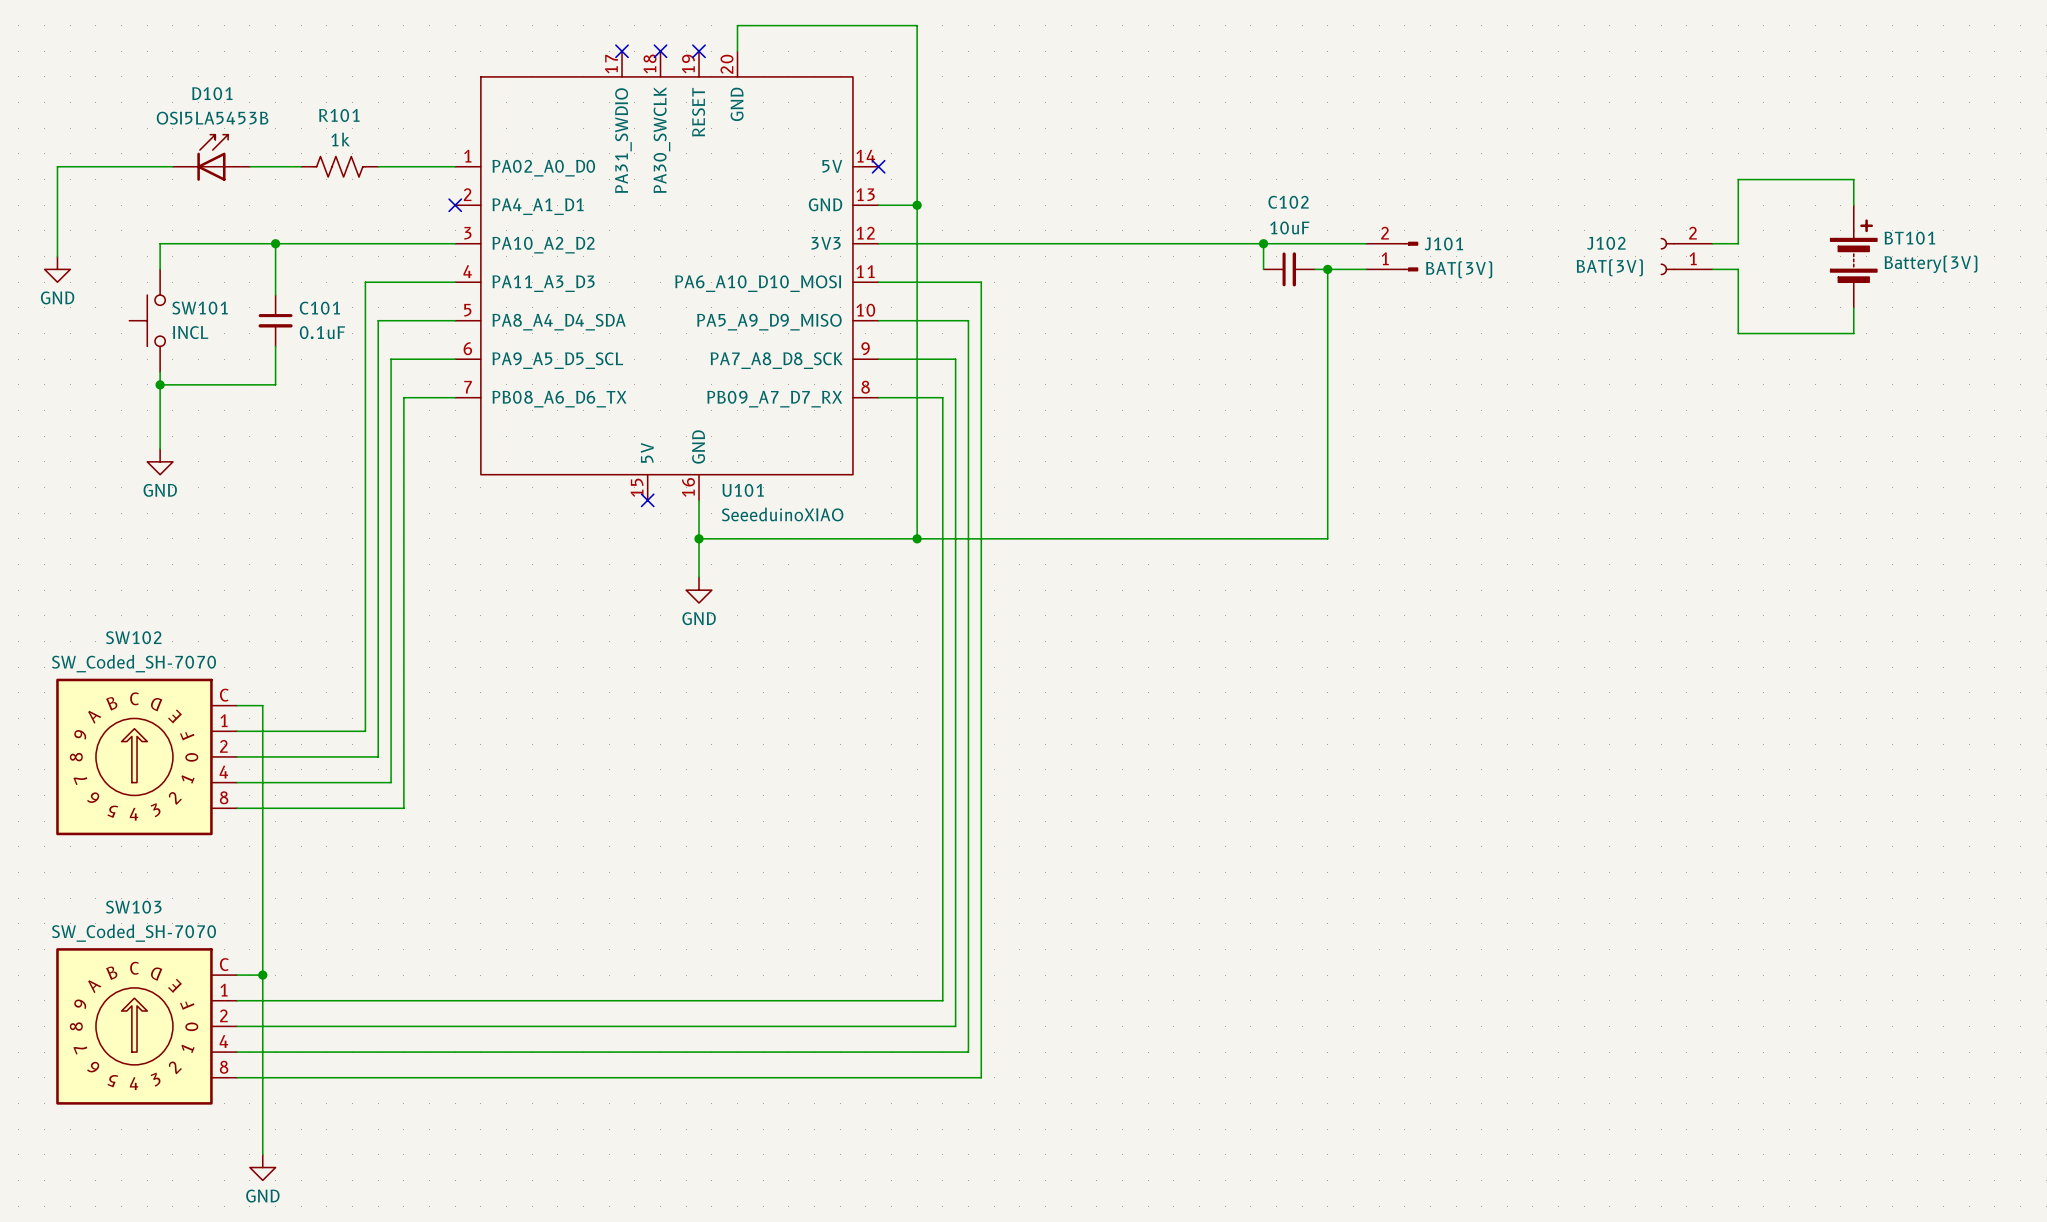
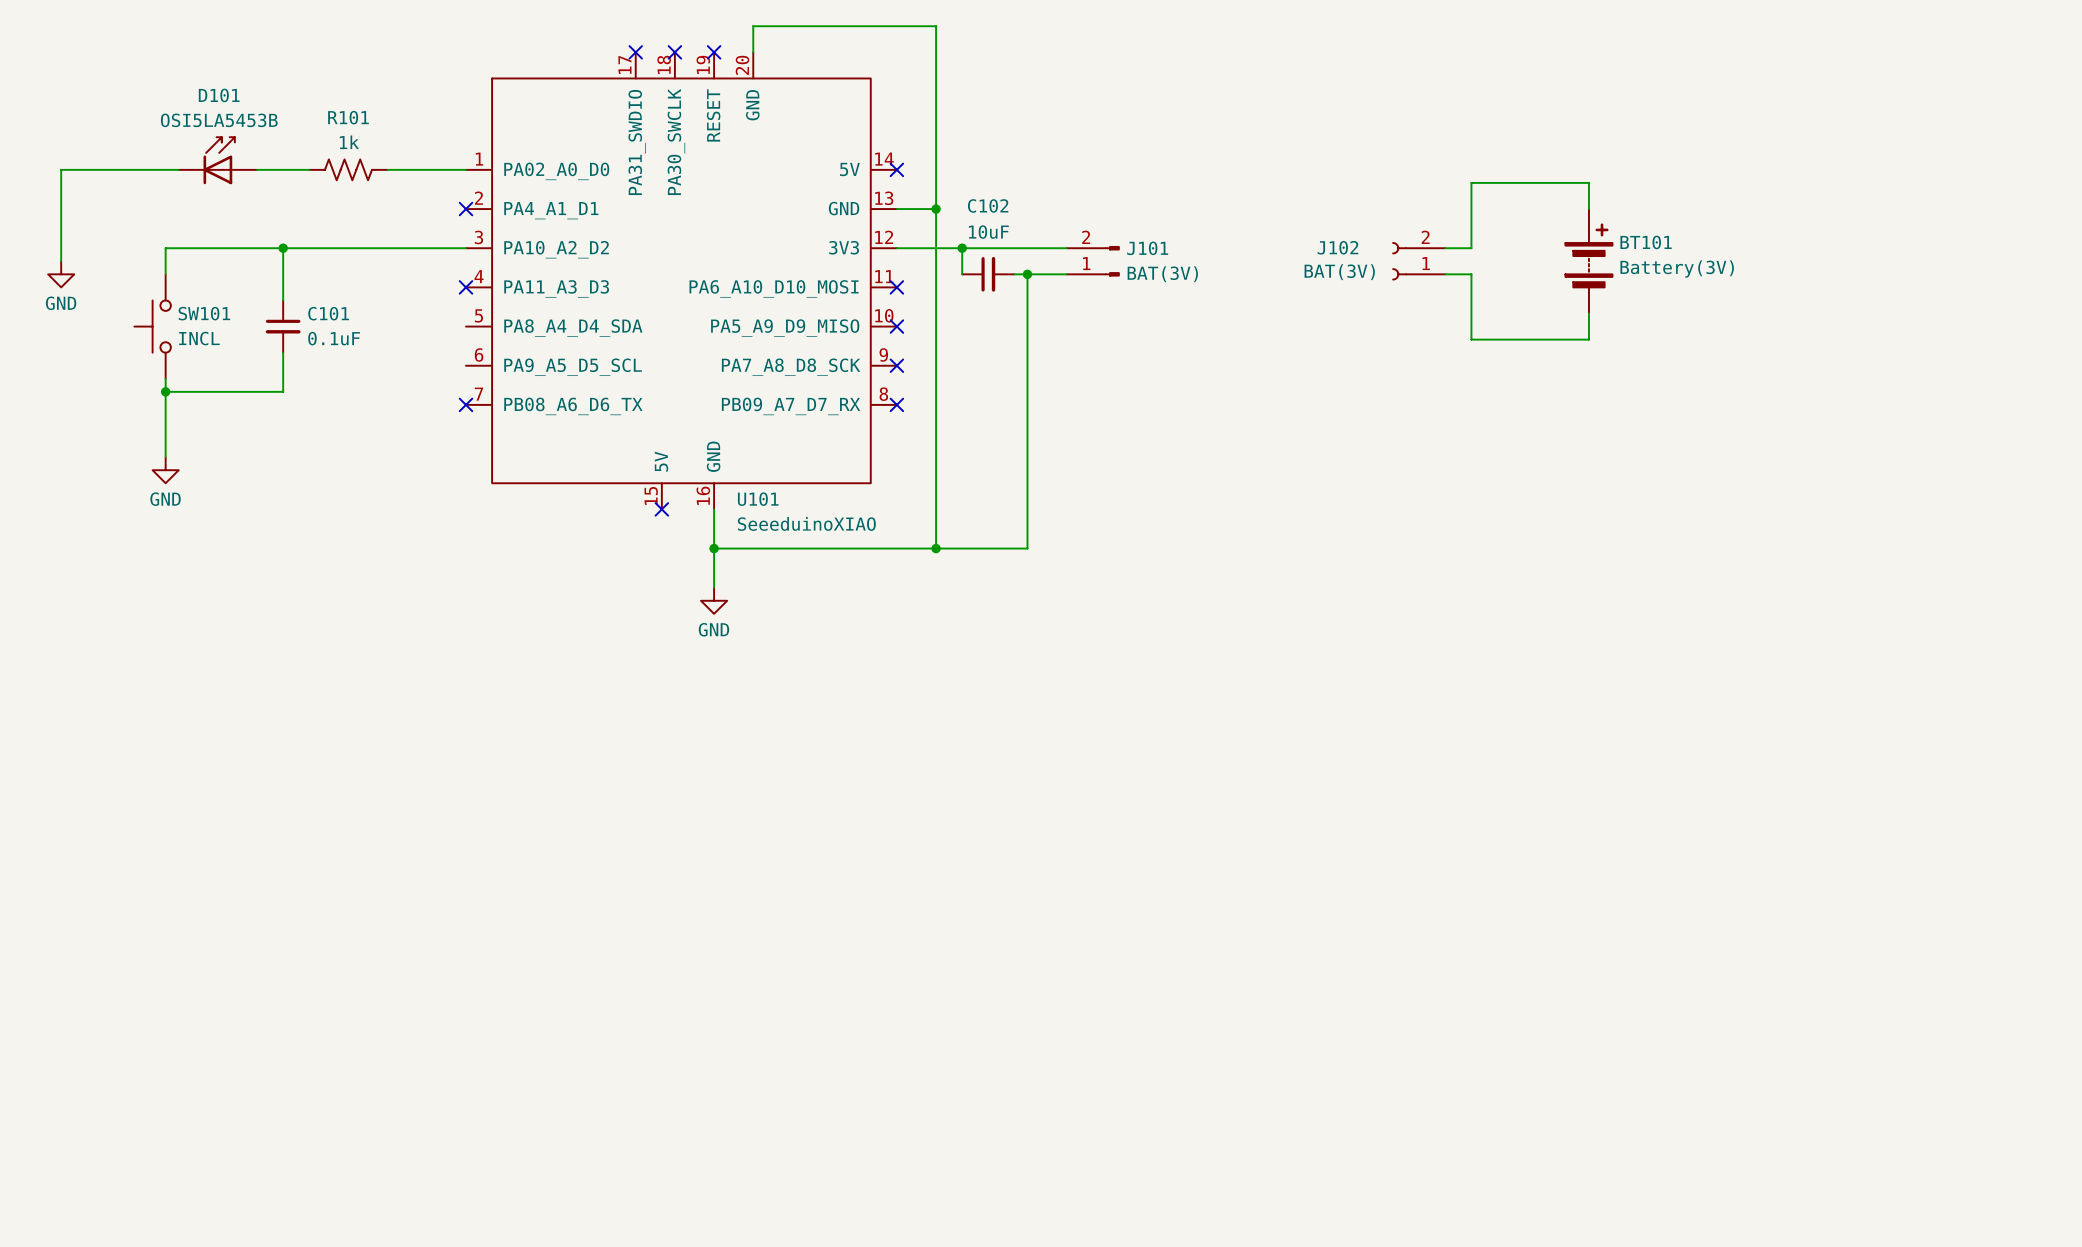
wire: none -> (1588, 209) (1588, 182) (1471, 182) (1471, 248) (1445, 248)
wire: (1853, 205) (1853, 179) (1738, 179) (1738, 243) (1712, 243) -> none
wire: none -> (962, 248) (962, 274)
junction: none -> (962, 248)
wire: (1045, 243) (1366, 243) -> none
wire: (1263, 243) (1263, 269) -> none
junction: (1263, 243) -> none
J101 position: (1392, 256) -> (1093, 261)
J102 position: (1686, 256) -> (1418, 261)
BT101 position: (1853, 256) -> (1588, 261)
wire: none -> (1014, 274) (1066, 274)
junction: none -> (1027, 274)
C102 position: (1289, 269) -> (988, 274)
wire: (1314, 269) (1366, 269) -> none
wire: (1327, 269) (1327, 538) (1006, 538) -> (1027, 274) (1027, 548)
junction: (1327, 269) -> none
wire: none -> (1445, 274) (1471, 274) (1471, 339) (1588, 339) (1588, 313)
wire: (1712, 269) (1738, 269) (1738, 333) (1853, 333) (1853, 307) -> none
wire: (455, 282) (365, 282) (365, 731) (237, 731) -> none
no-connect mark: none -> (465, 287)
wire: (878, 282) (981, 282) (981, 1077) (237, 1077) -> none
no-connect mark: none -> (896, 287)
wire: (455, 320) (378, 320) (378, 756) (237, 756) -> none
wire: (878, 320) (968, 320) (968, 1052) (237, 1052) -> none
no-connect mark: none -> (896, 326)
wire: (455, 359) (391, 359) (391, 782) (237, 782) -> none
wire: (878, 359) (955, 359) (955, 1026) (237, 1026) -> none
no-connect mark: none -> (896, 365)
wire: (455, 397) (403, 397) (403, 808) (237, 808) -> none
no-connect mark: none -> (465, 404)
wire: (878, 397) (942, 397) (942, 1000) (237, 1000) -> none
no-connect mark: none -> (896, 404)
wire: (237, 705) (262, 705) (262, 1154) -> none
SW102: SW_Coded_SH-7070 (146, 756) -> none
wire: (237, 975) (262, 975) -> none
junction: (262, 975) -> none
SW103: SW_Coded_SH-7070 (146, 1026) -> none
power symbol: GND (262, 1167) -> none

